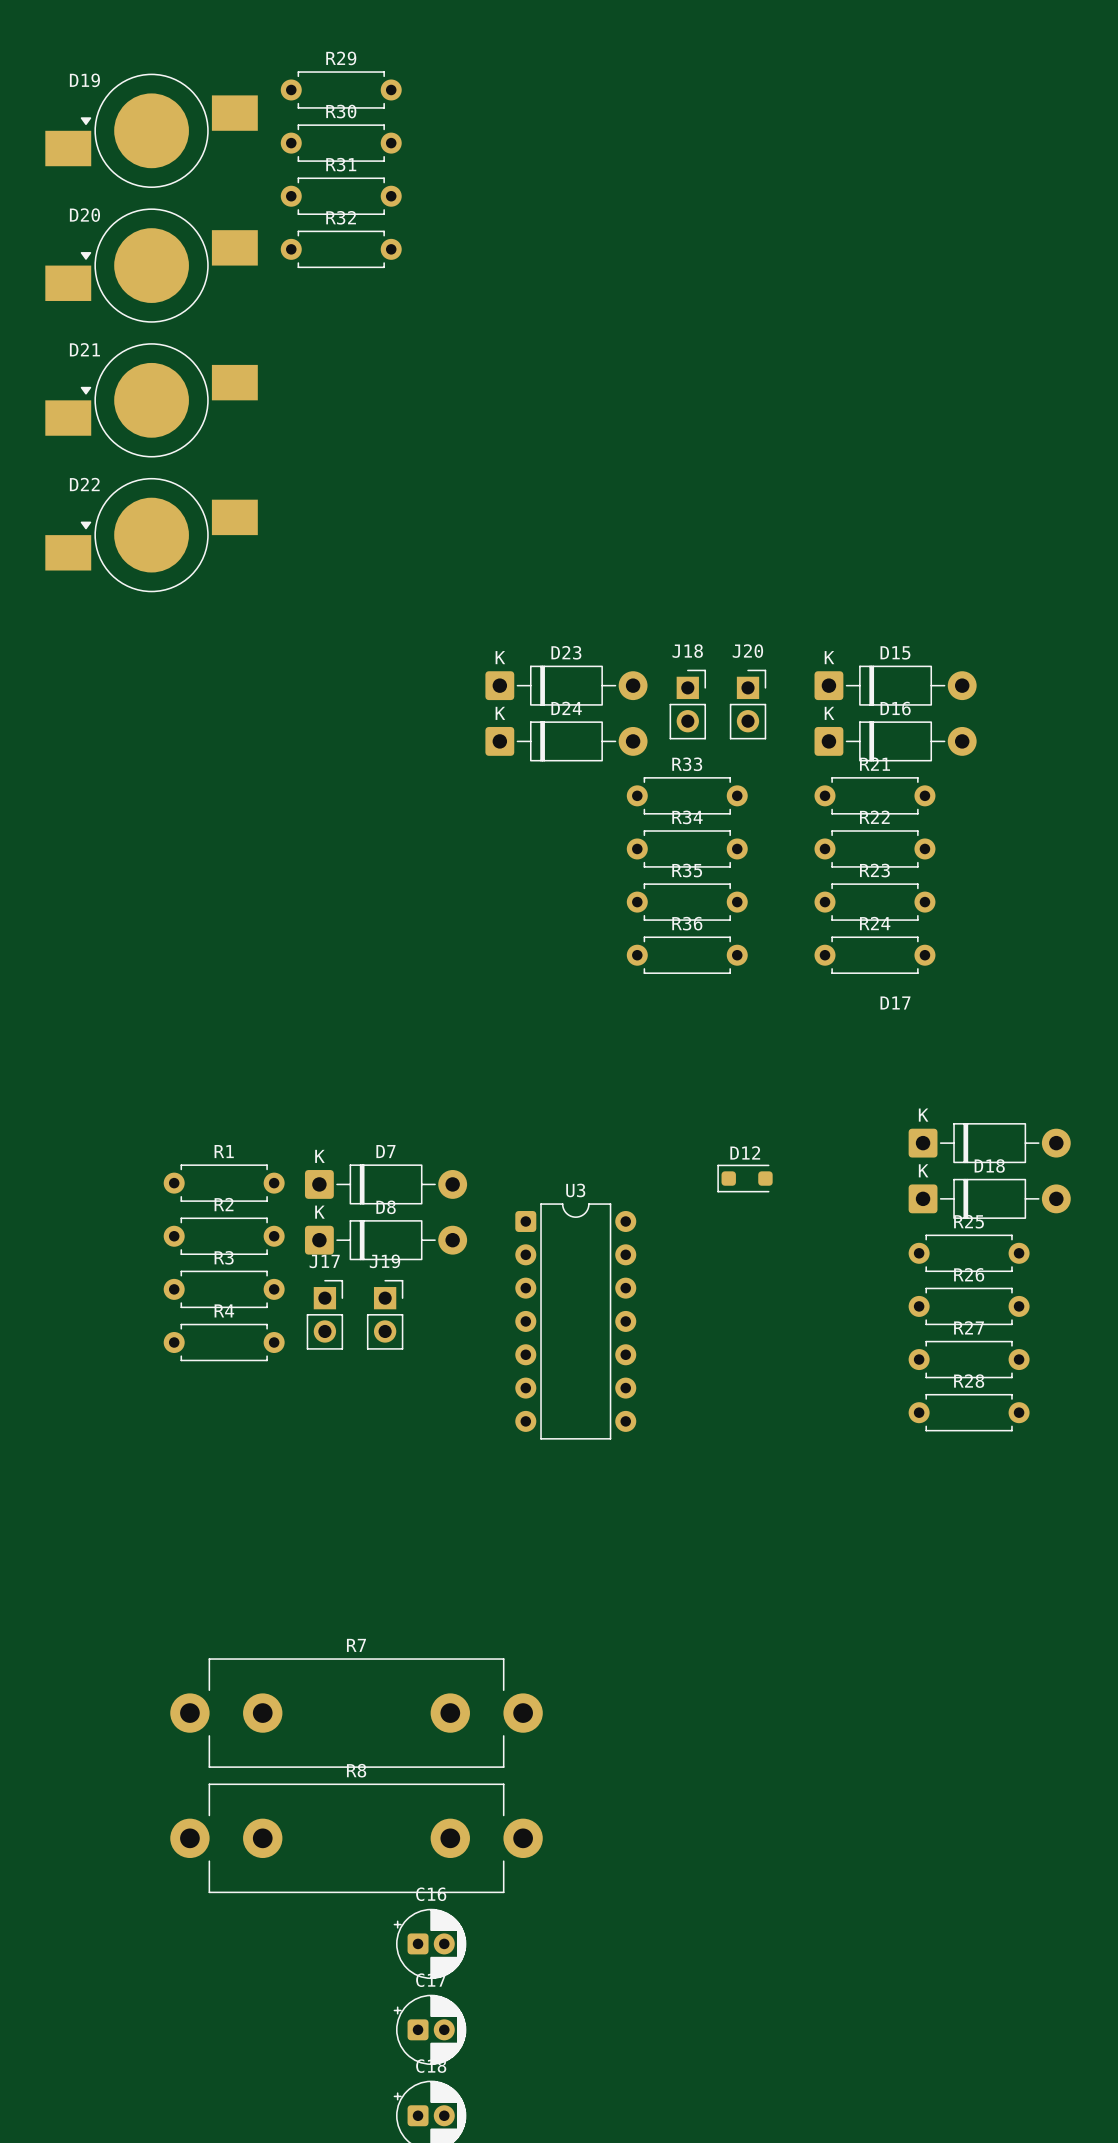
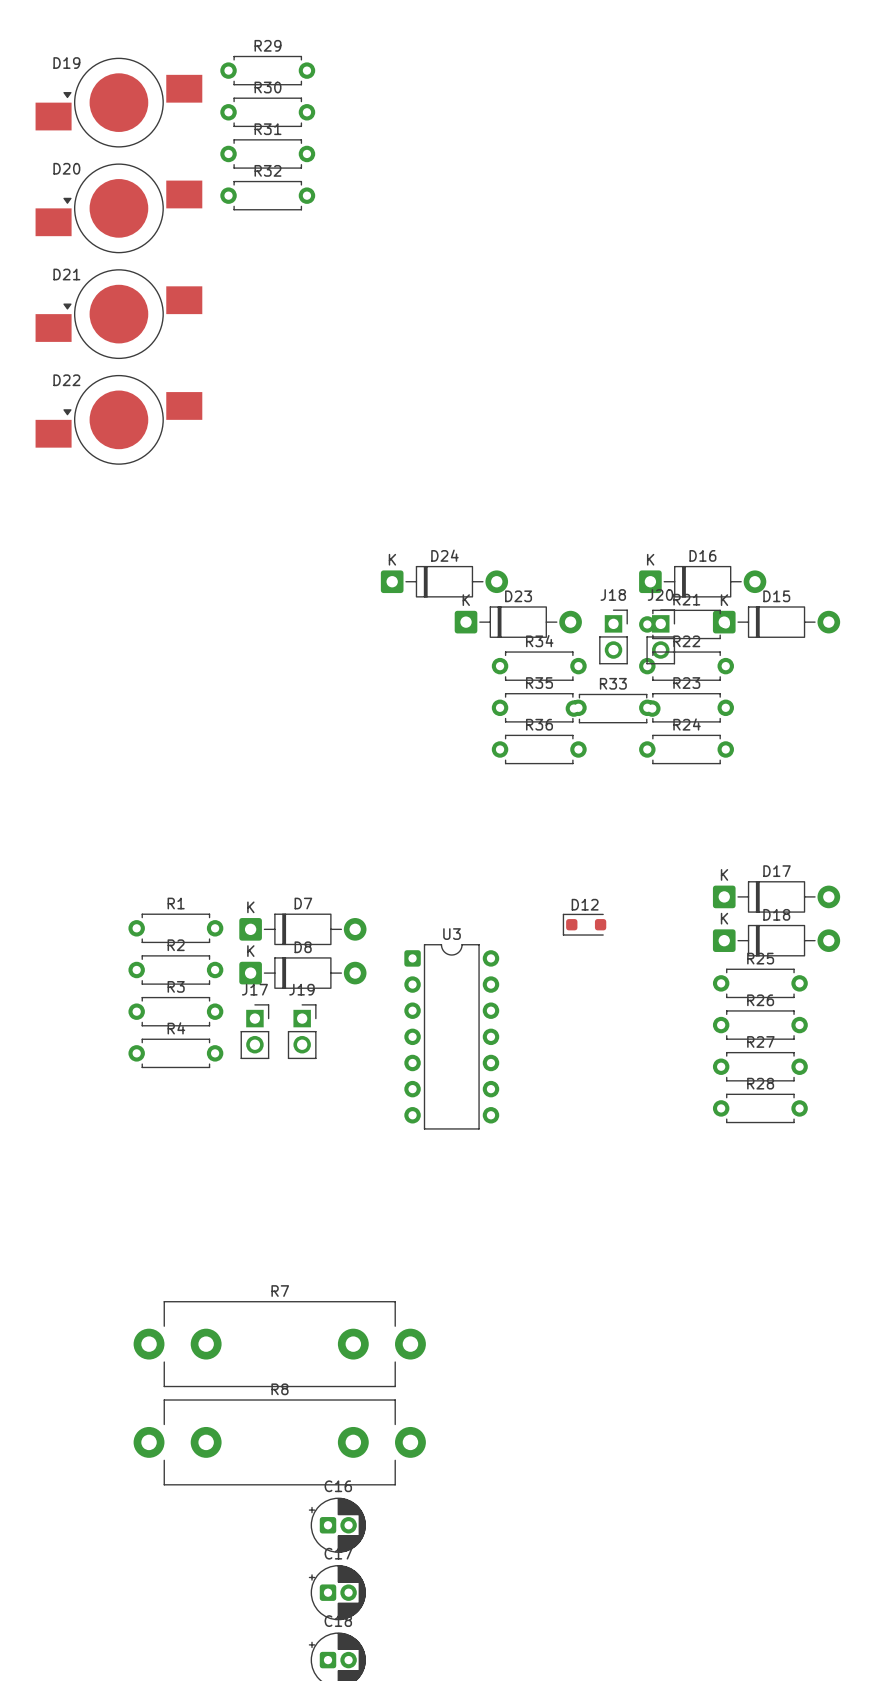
D23 position: (566, 685) -> (518, 622)
D15 position: (895, 685) -> (776, 622)
J18 position: (687, 704) -> (613, 636)
J20 position: (748, 704) -> (660, 636)
R33 position: (687, 795) -> (613, 708)
D17 name position: D17 (895, 1003) -> D17 (777, 871)

